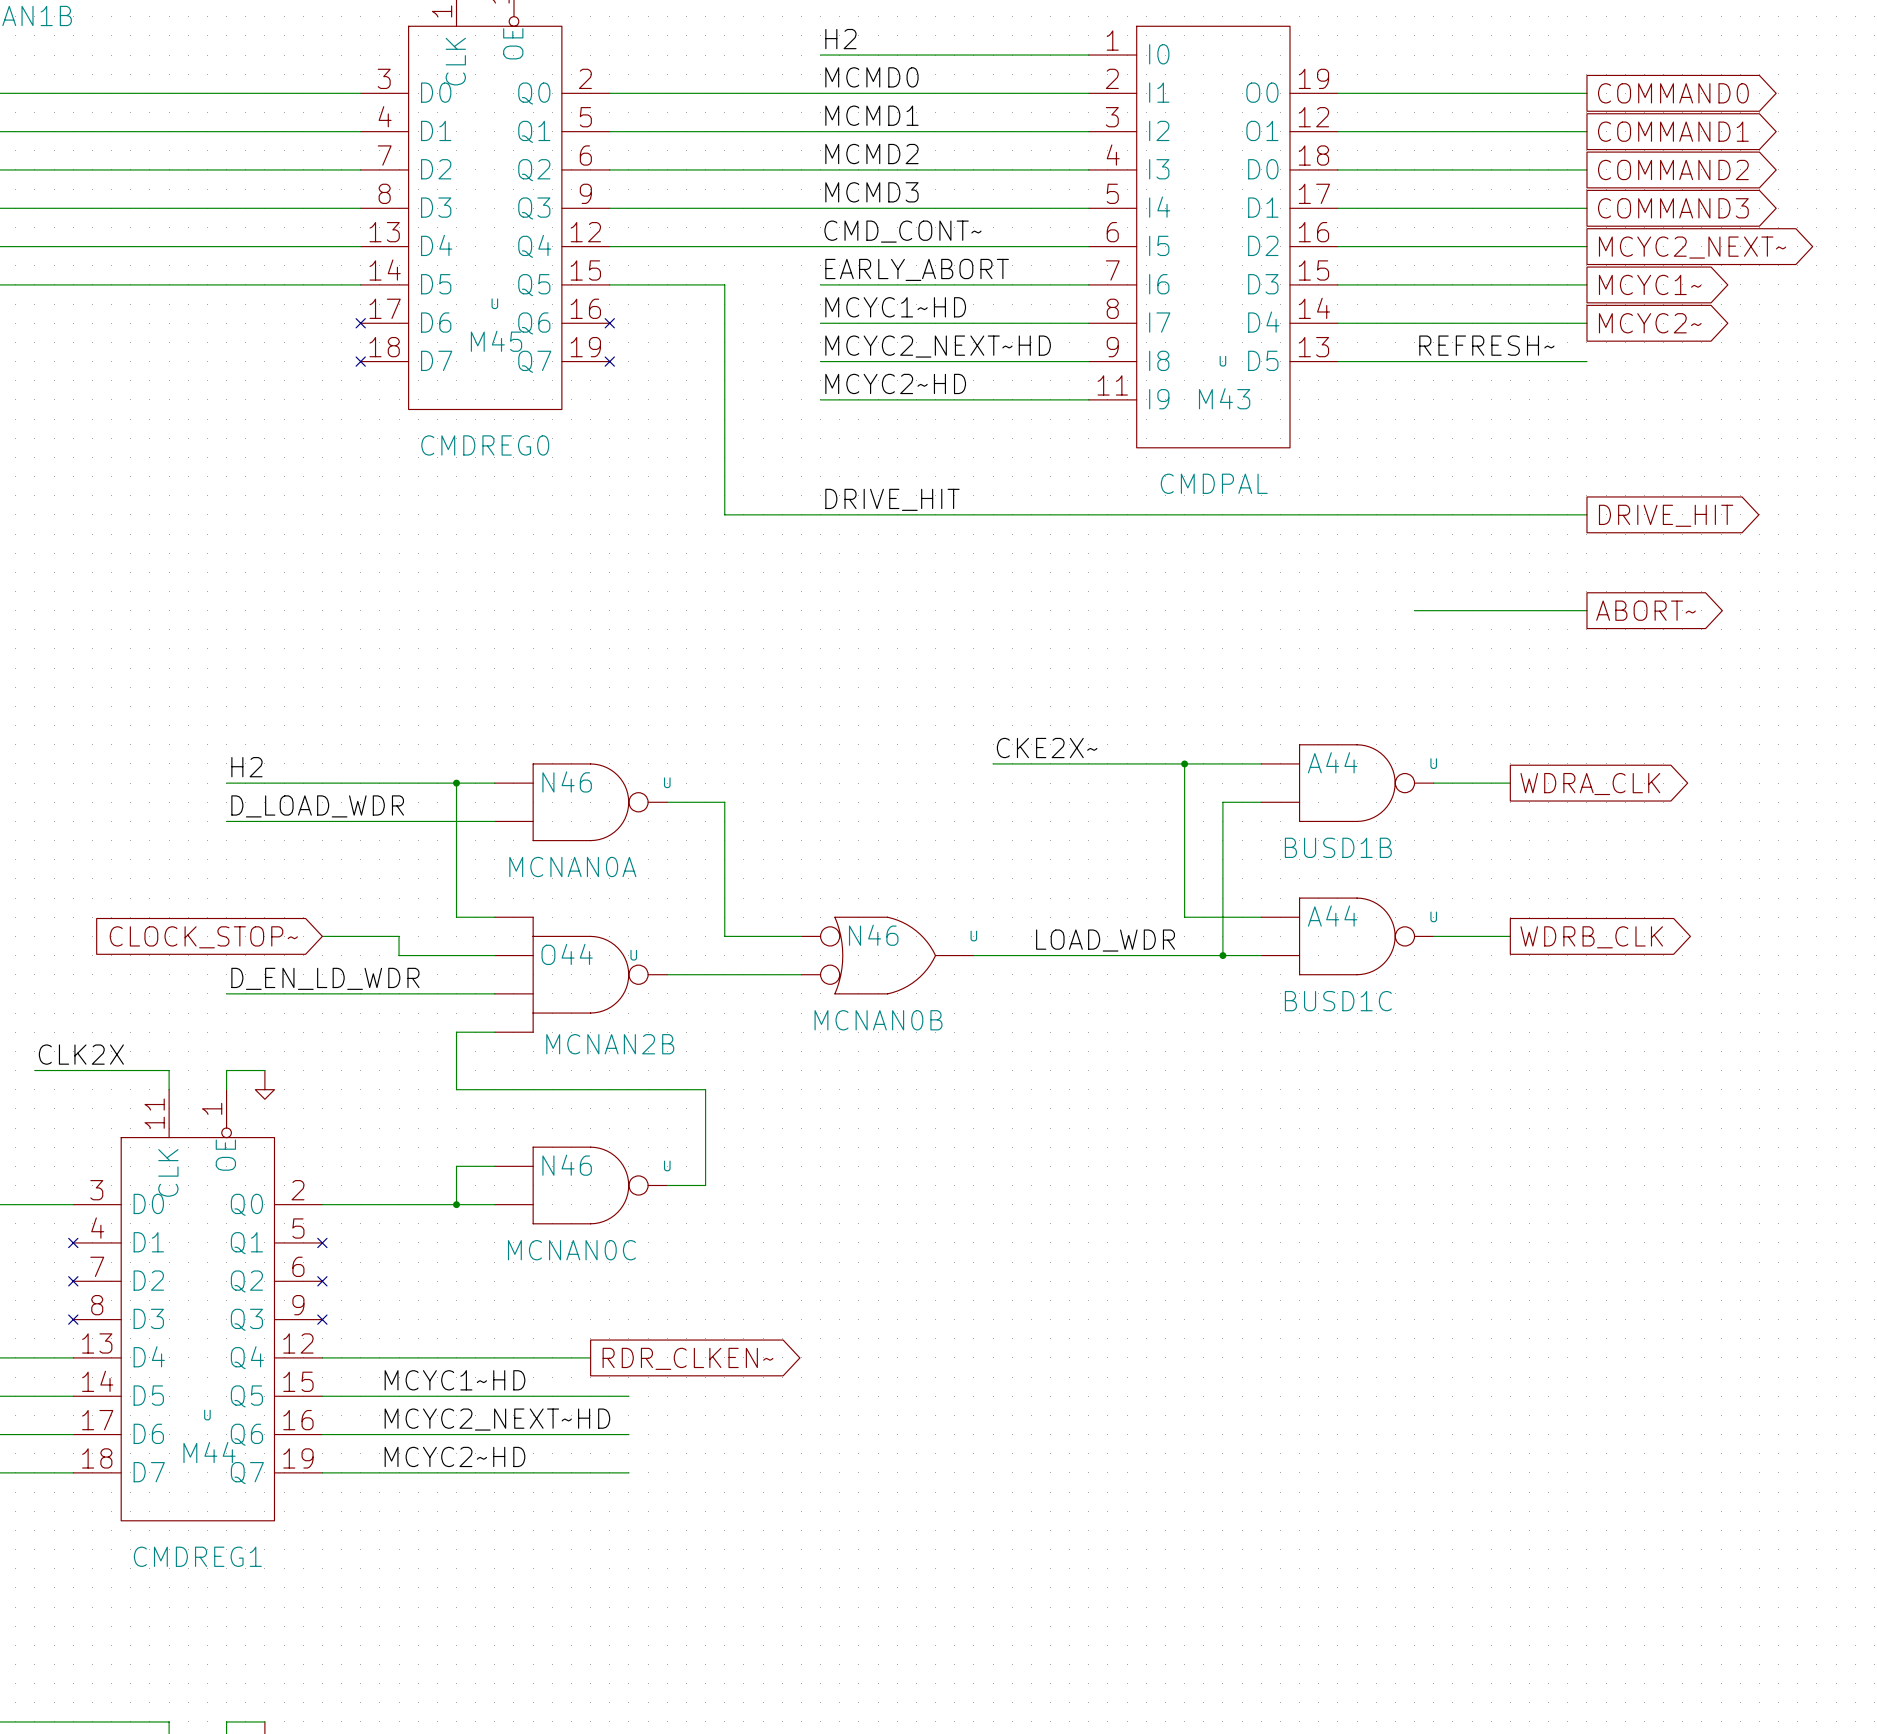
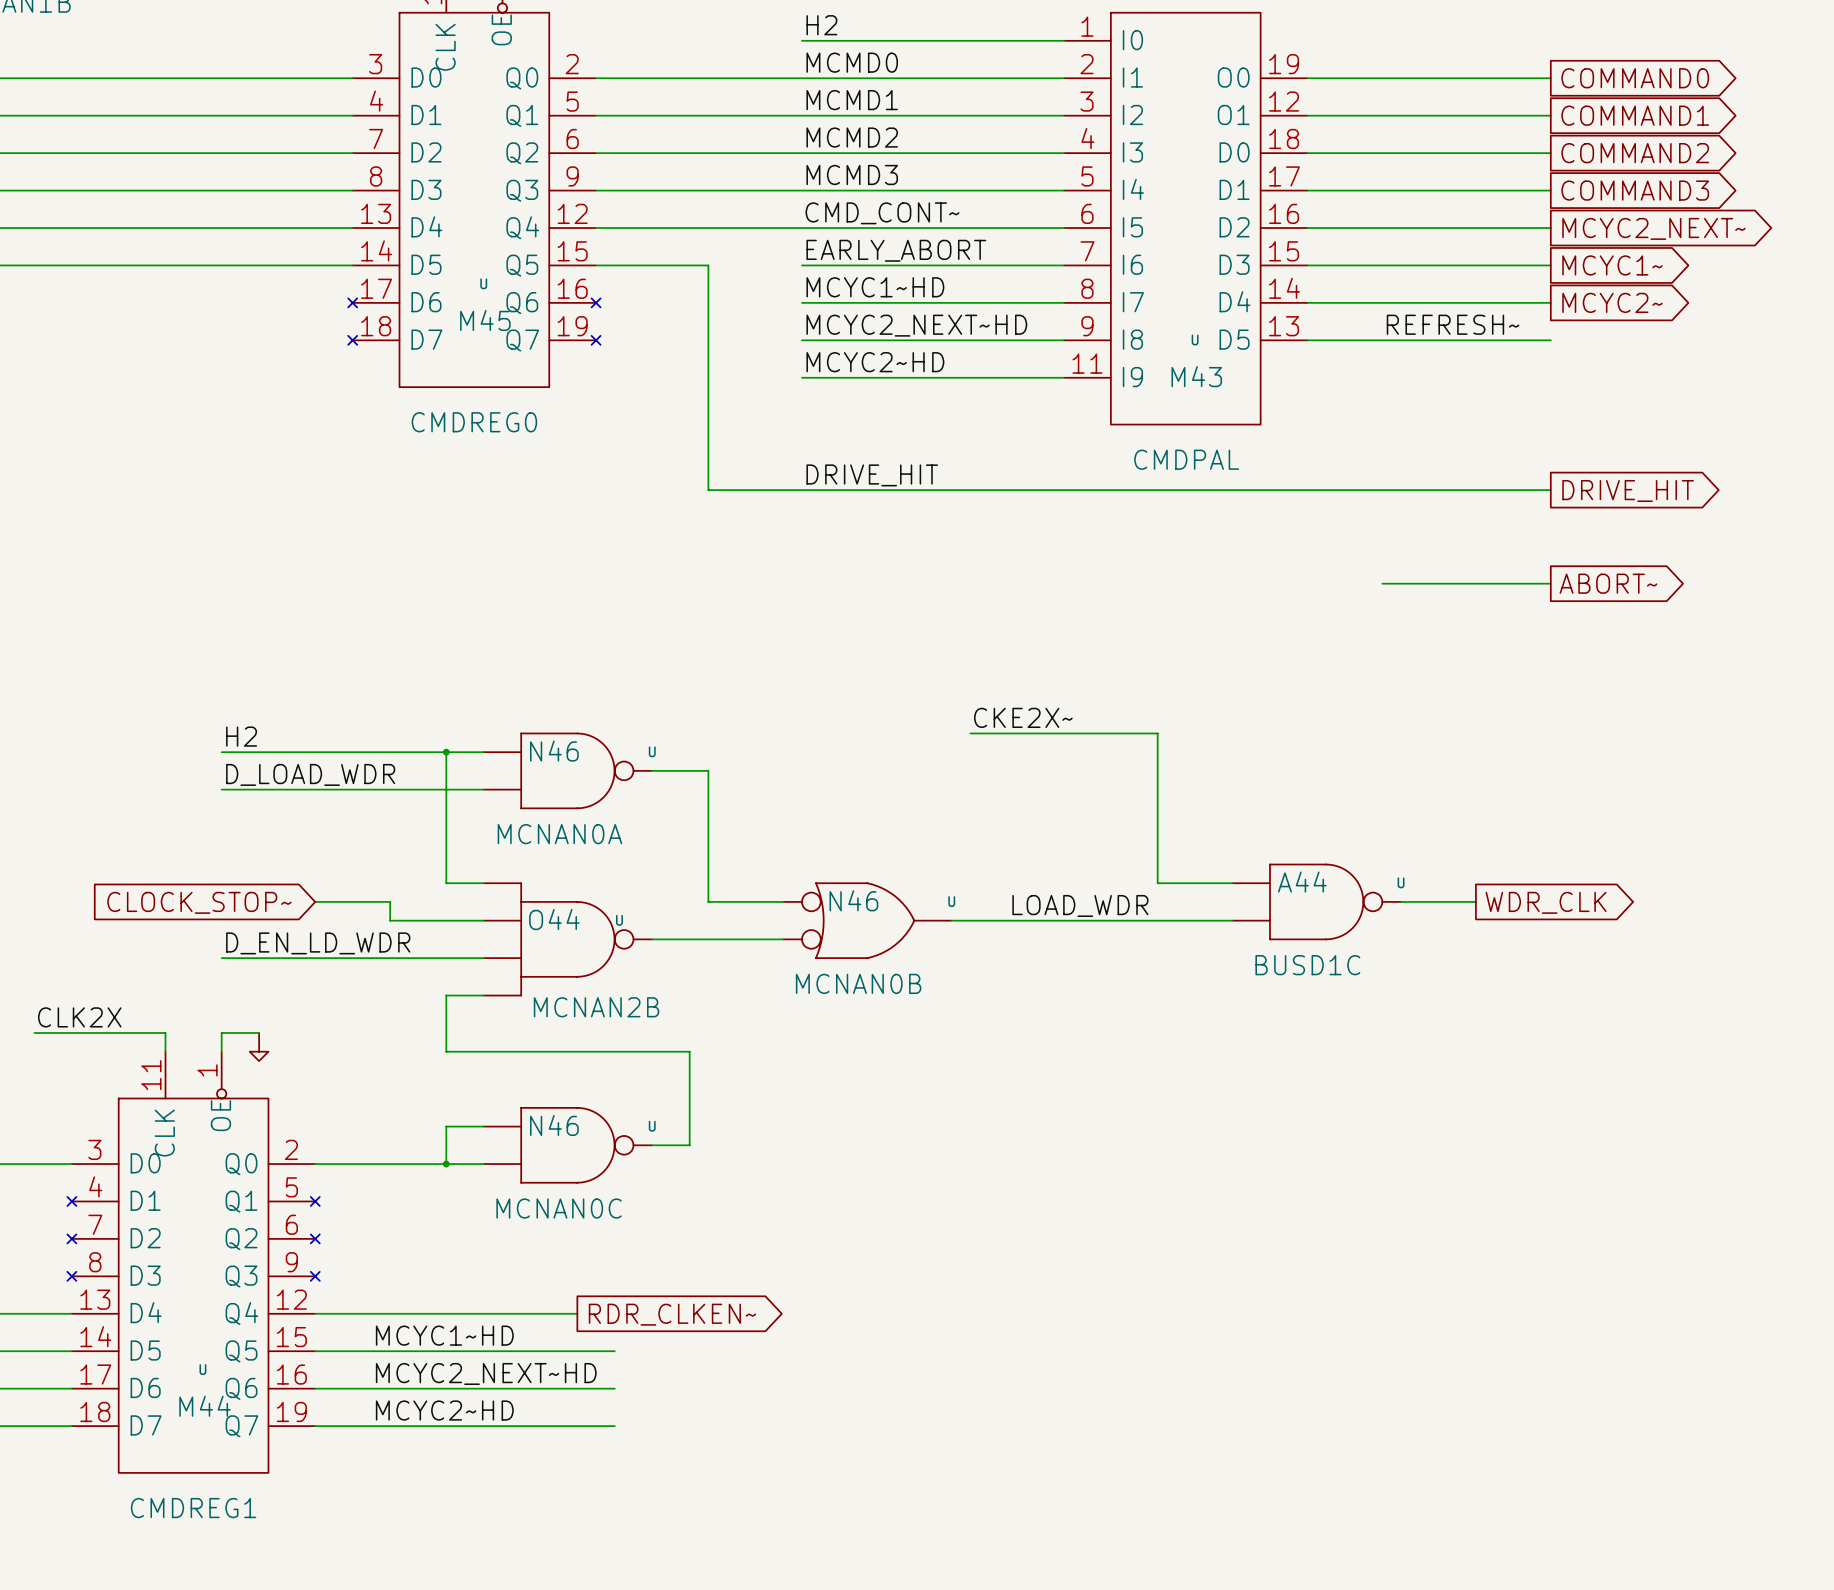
wire: (1184, 763) (1261, 763) -> none
junction: (1184, 763) -> none
U: (1347, 783) -> none
wire: (1433, 783) (1510, 783) -> none
global label: WDRA_CLK (1590, 784) -> none
wire: (1261, 802) (1222, 802) (1222, 955) -> none
global label: WDRB_CLK (1591, 937) -> WDR_CLK (1546, 902)
junction: (1222, 955) -> none

